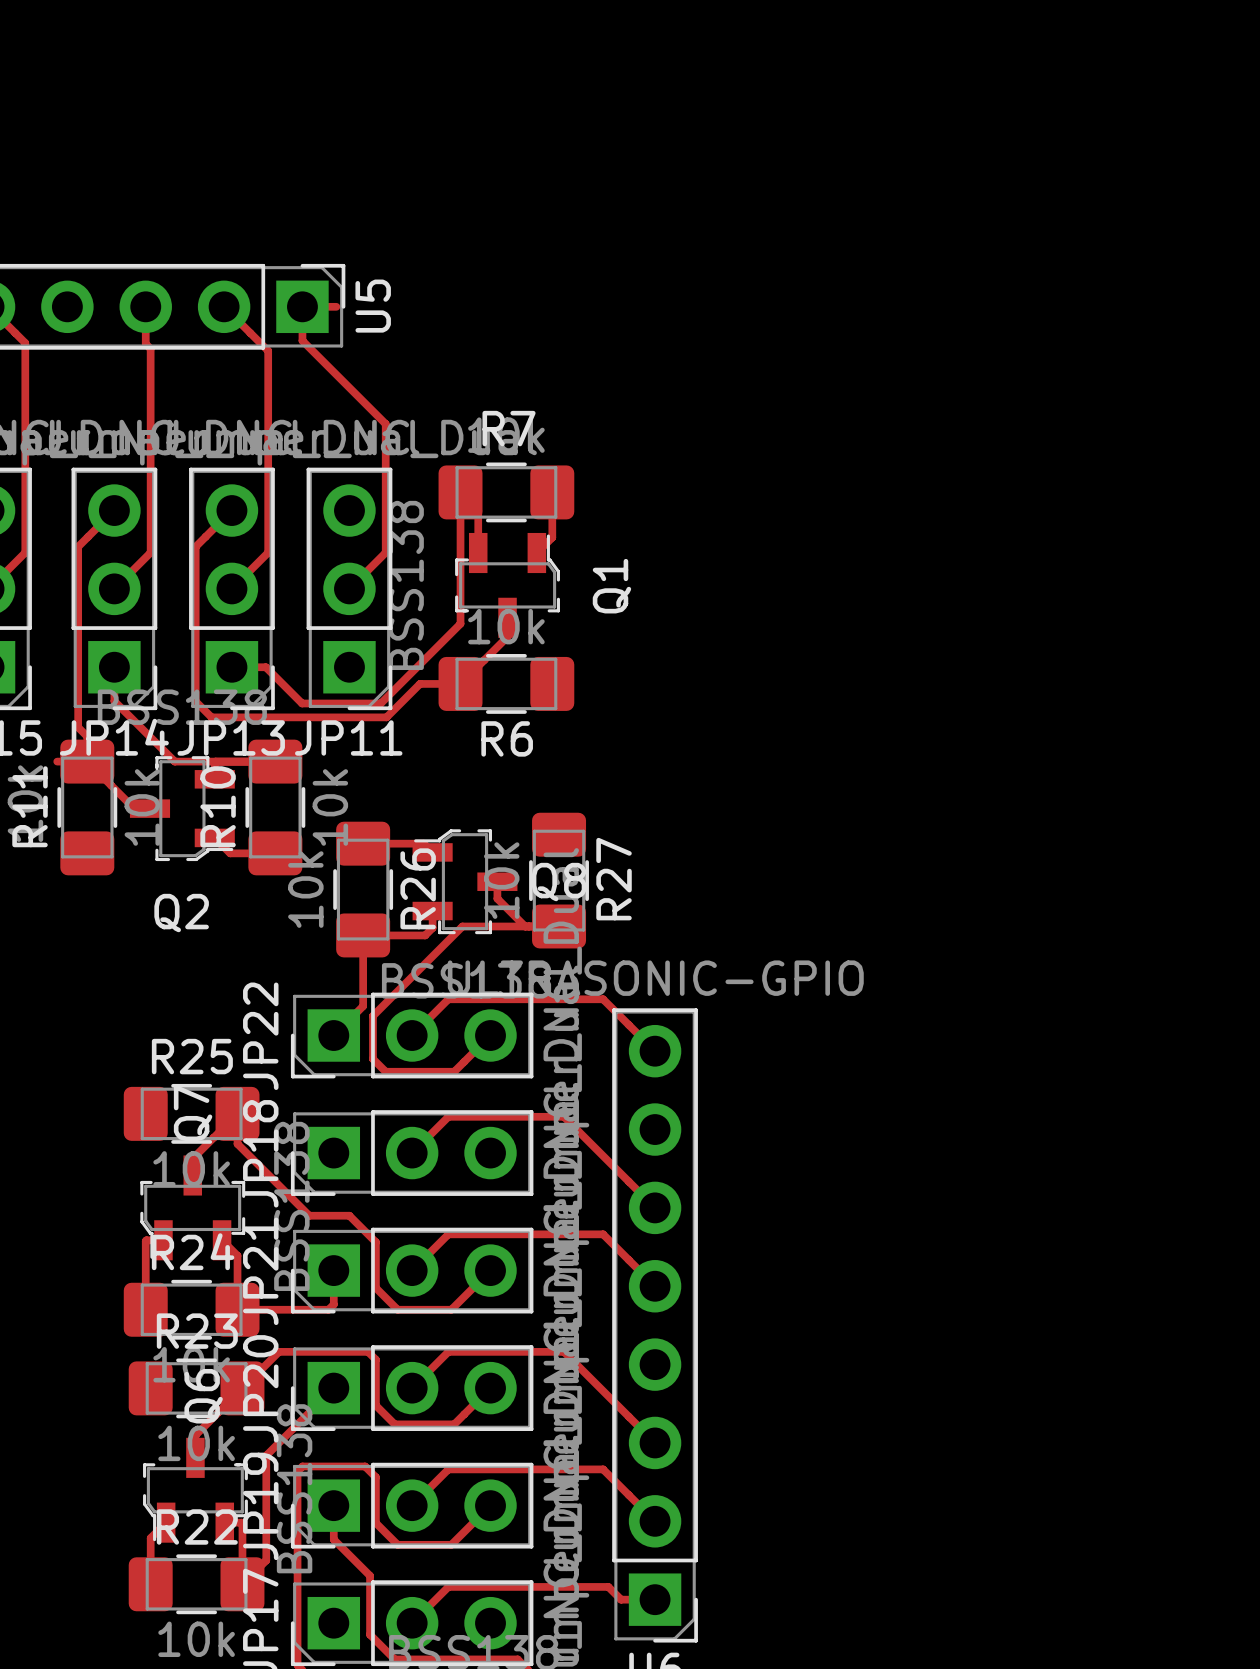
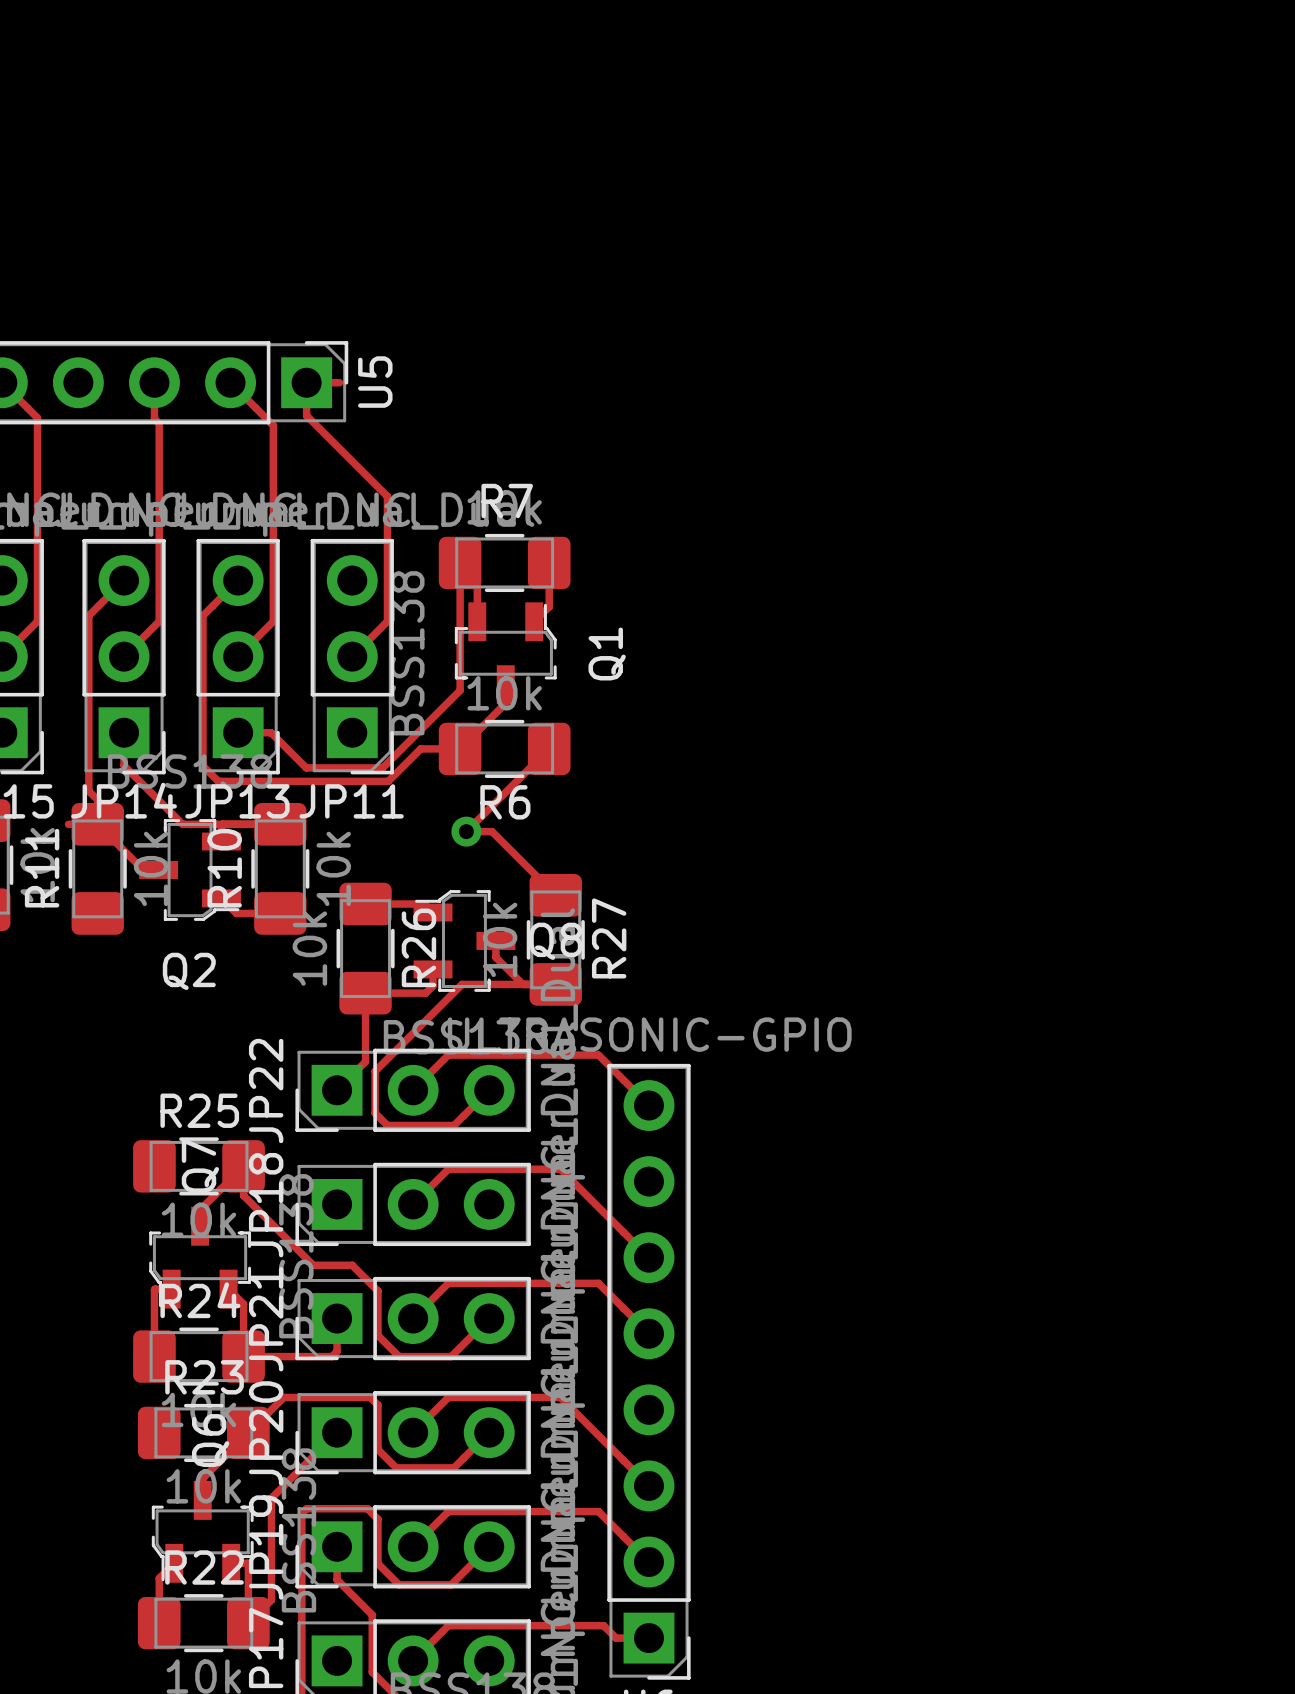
track: none -> (549, 748) (466, 831) (492, 831) (555, 895)
via: none -> (466, 831)

